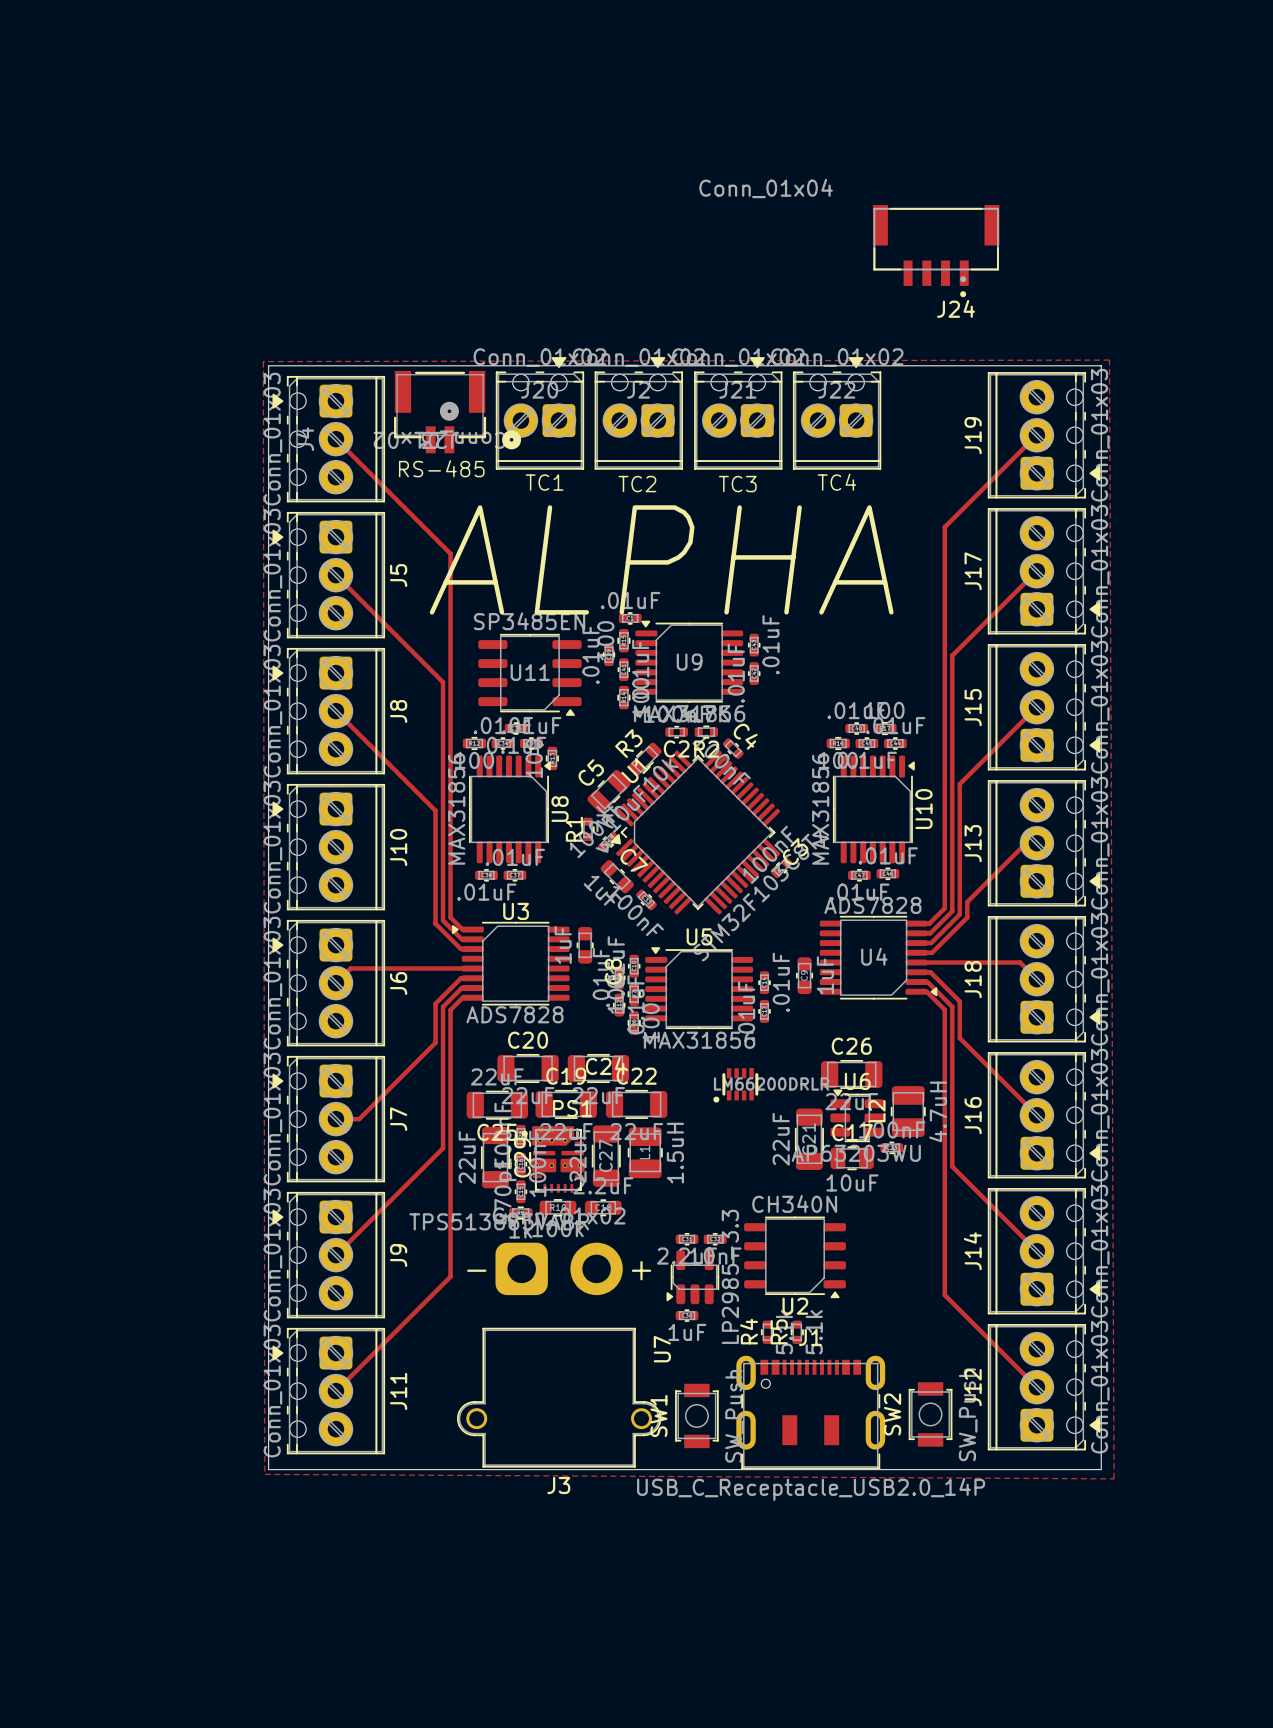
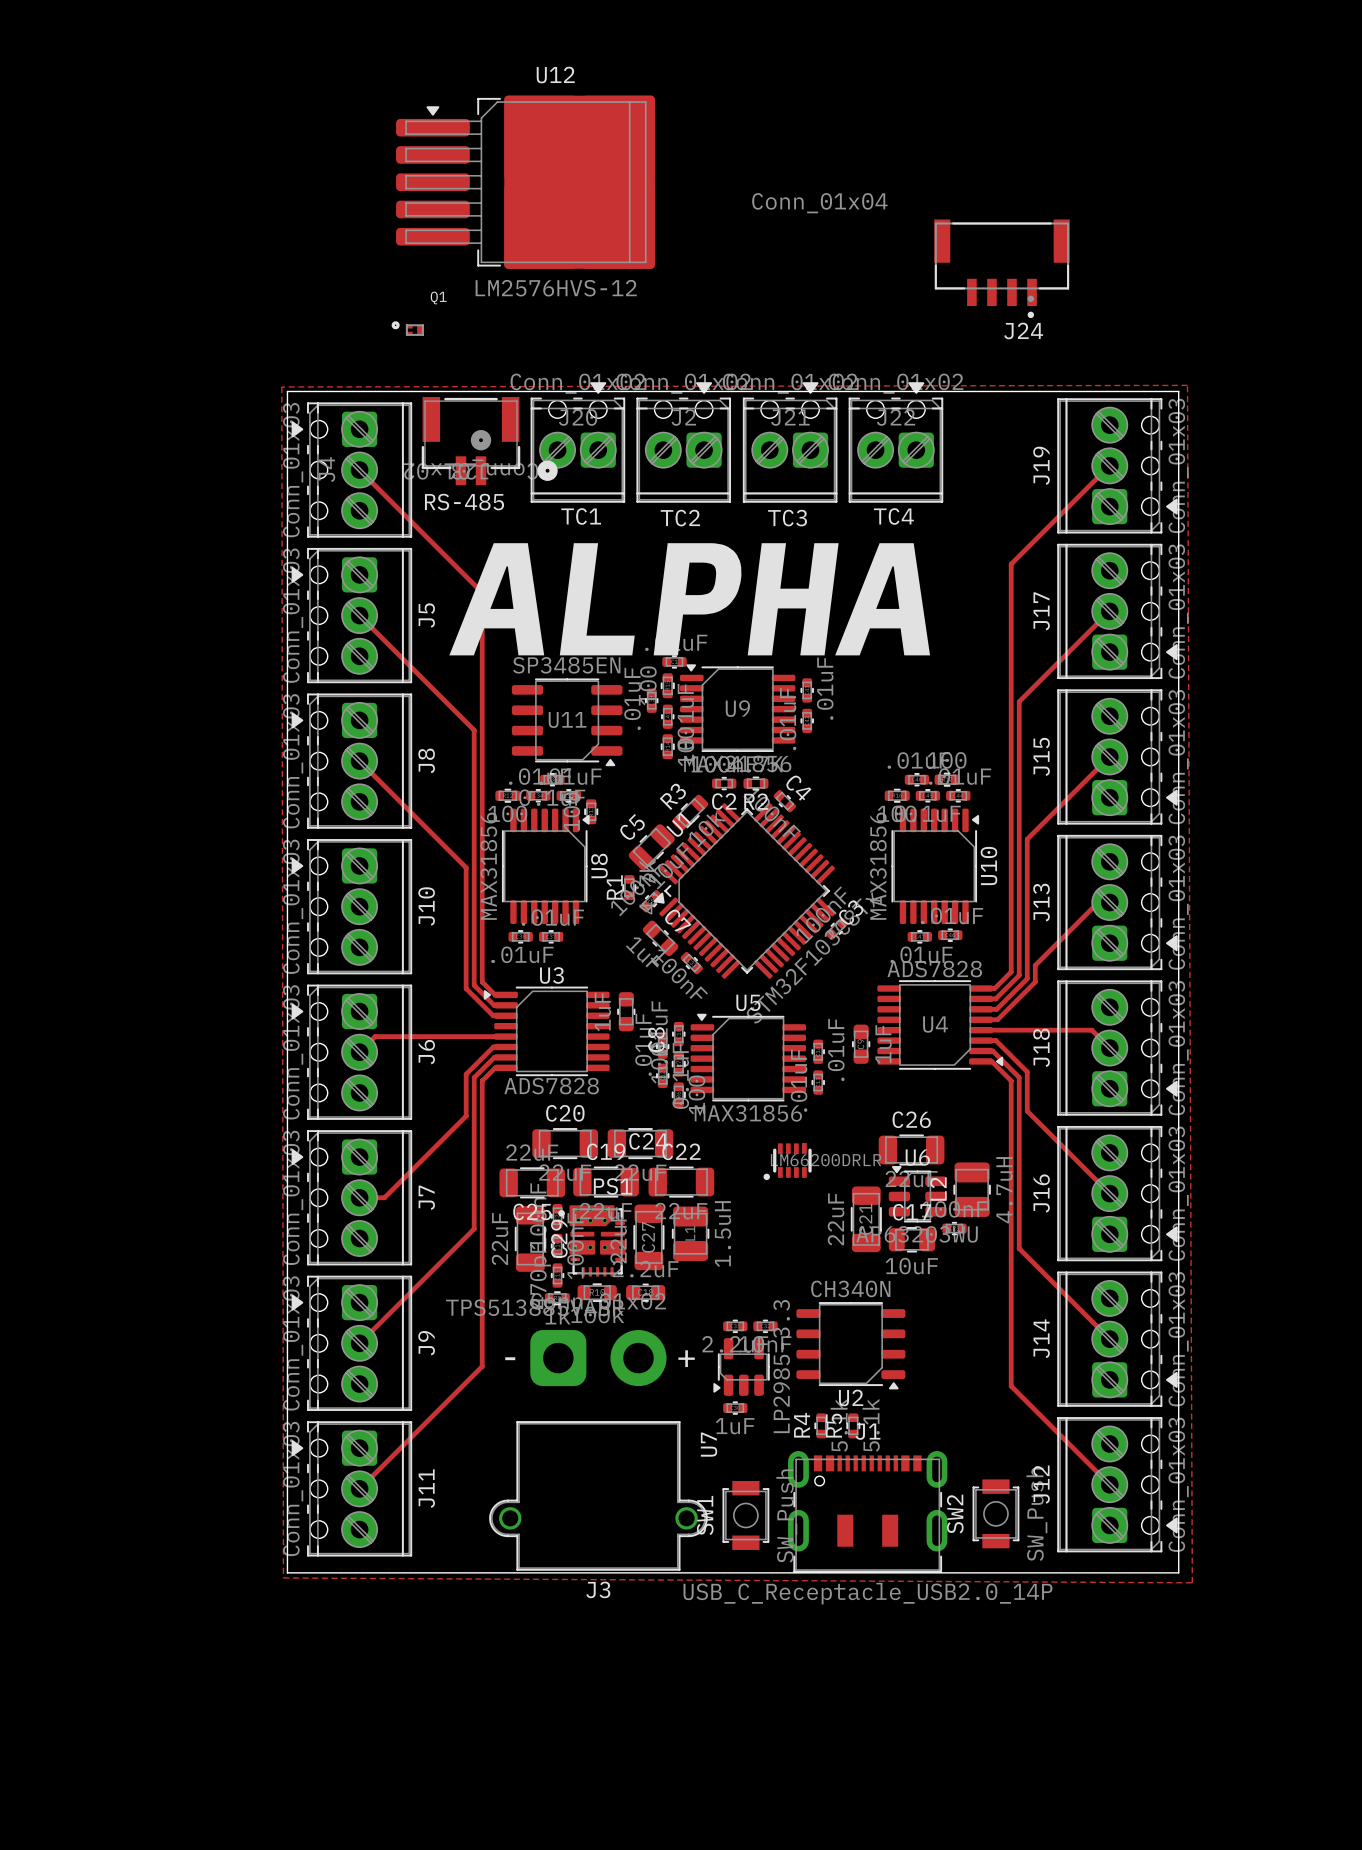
U12: none -> LM2576HVS-12 (525, 182)
Q1: none -> (407, 328)

